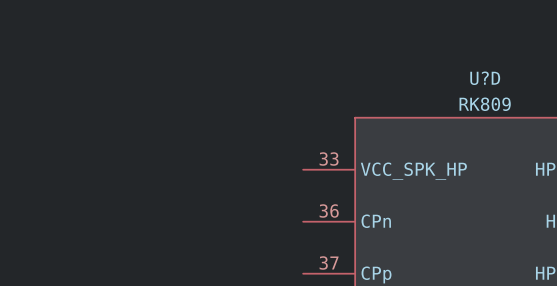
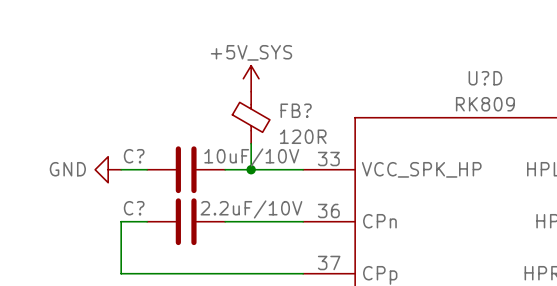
power symbol: none -> +5V_SYS (251, 78)
FB?: none -> 120R (251, 117)
wire: none -> (251, 143) (251, 169)
power symbol: none -> GND (108, 169)
wire: none -> (121, 169) (147, 169)
C?: none -> 10uF/10V (186, 169)
wire: none -> (225, 169) (303, 169)
junction: none -> (251, 169)
wire: none -> (147, 221) (121, 221) (121, 273) (303, 273)
C?: none -> 2.2uF/10V (186, 221)
wire: none -> (225, 221) (303, 221)

